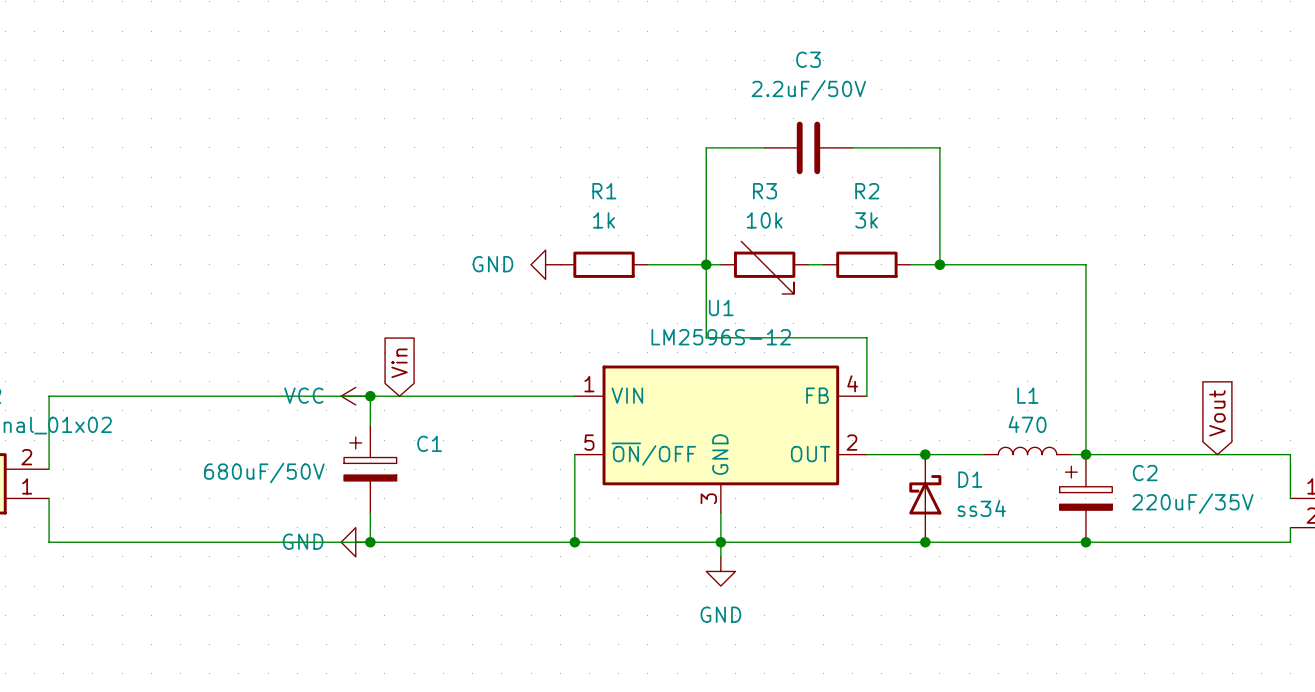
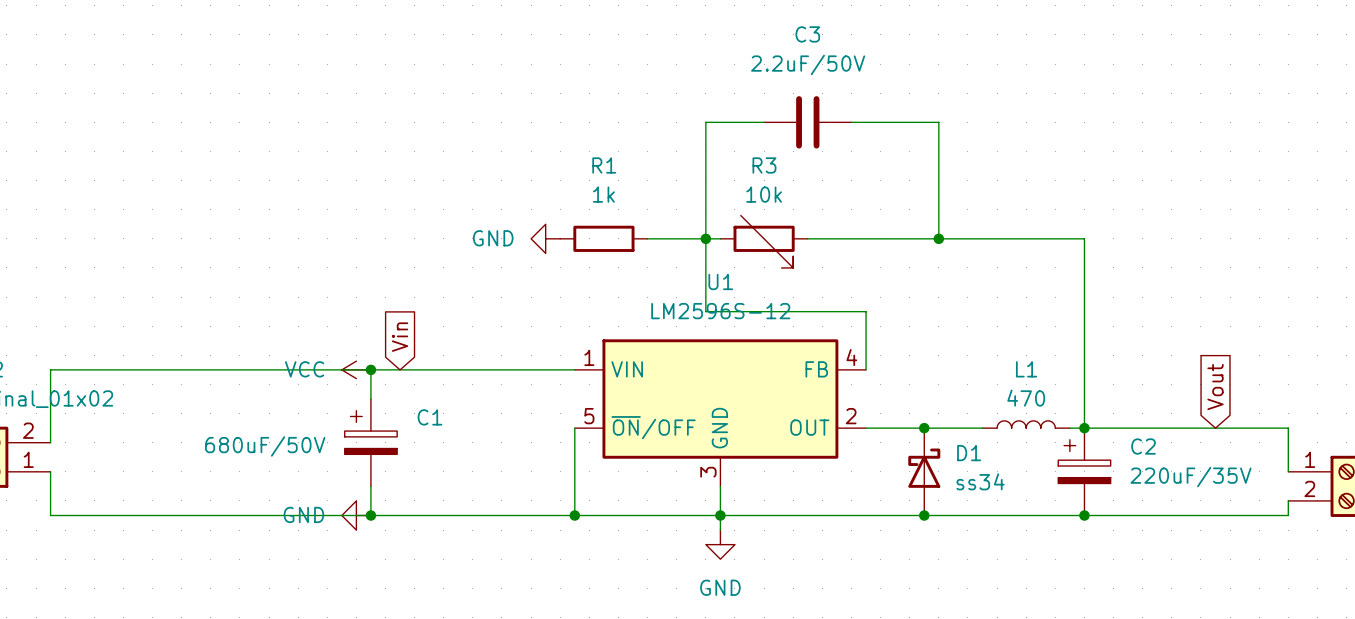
wire: none -> (822, 238) (909, 238)
R2: 3k (866, 264) -> none

